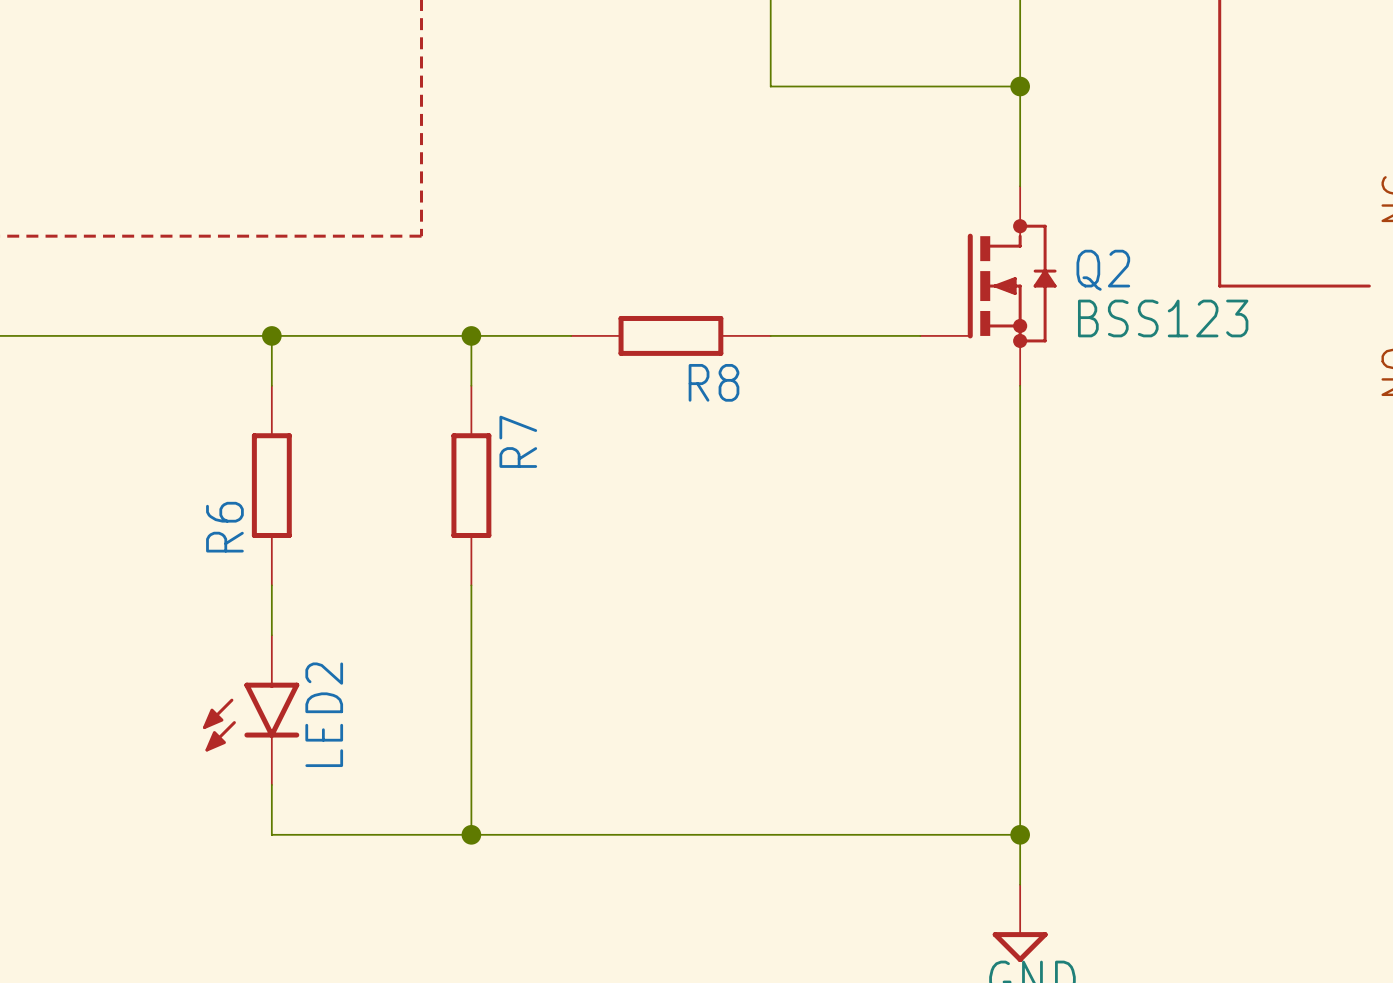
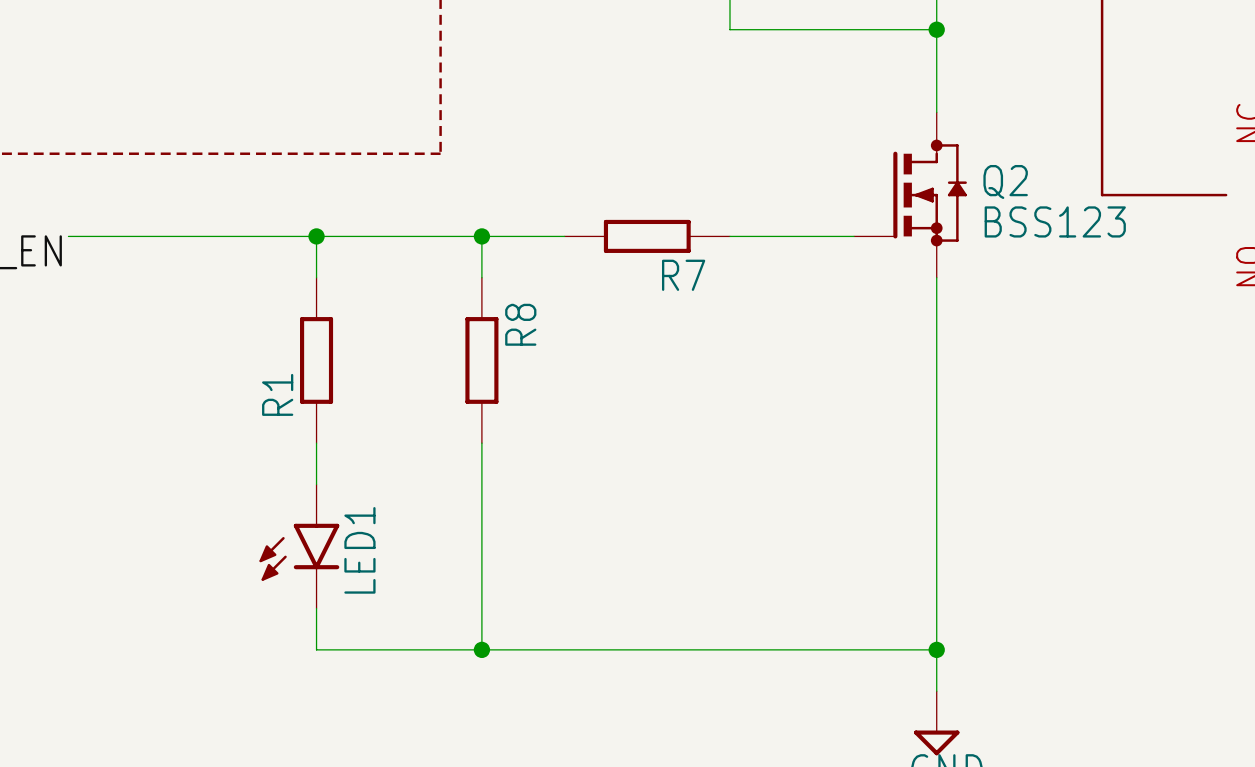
R8 name: R8 (714, 382) -> R7 (683, 275)
R7 name: R7 (518, 441) -> R8 (520, 324)
R6 name: R6 (224, 527) -> R1 (277, 394)
LED2 name: LED2 (324, 714) -> LED1 (359, 550)

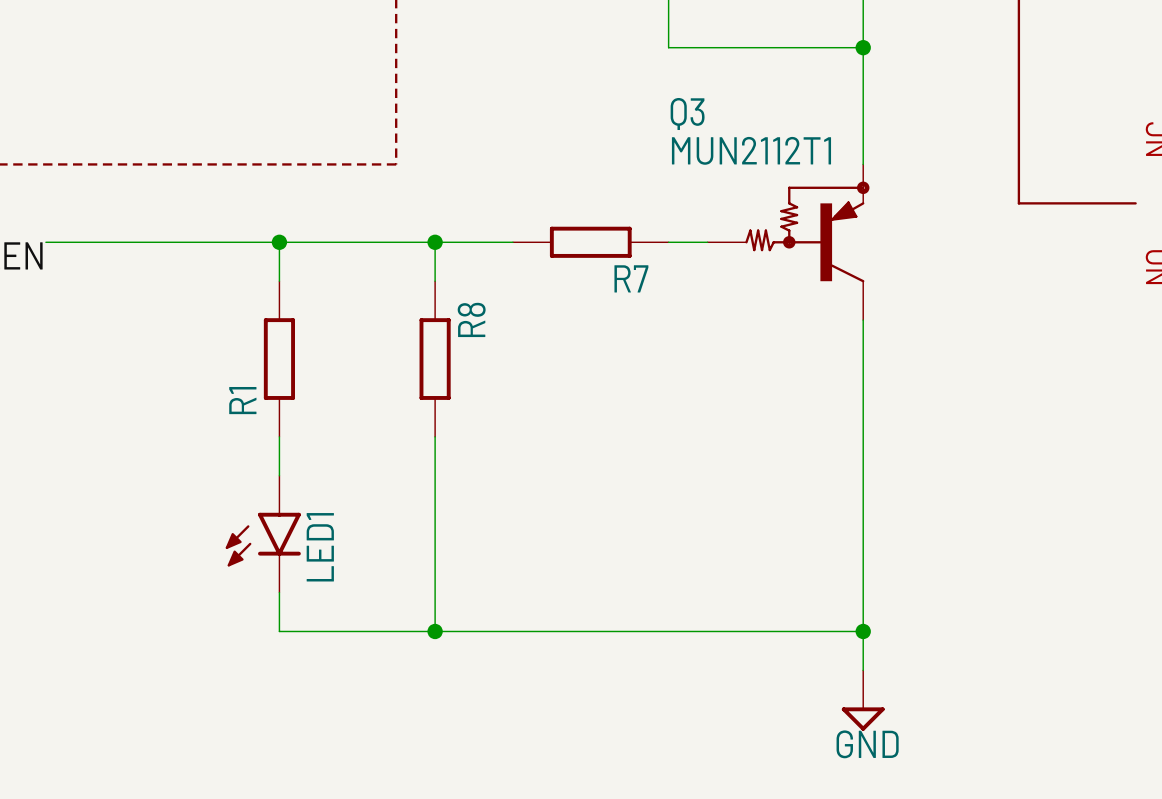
Q2: BSS123 (910, 195) -> none
Q3: none -> MUN2112T1 (788, 242)

